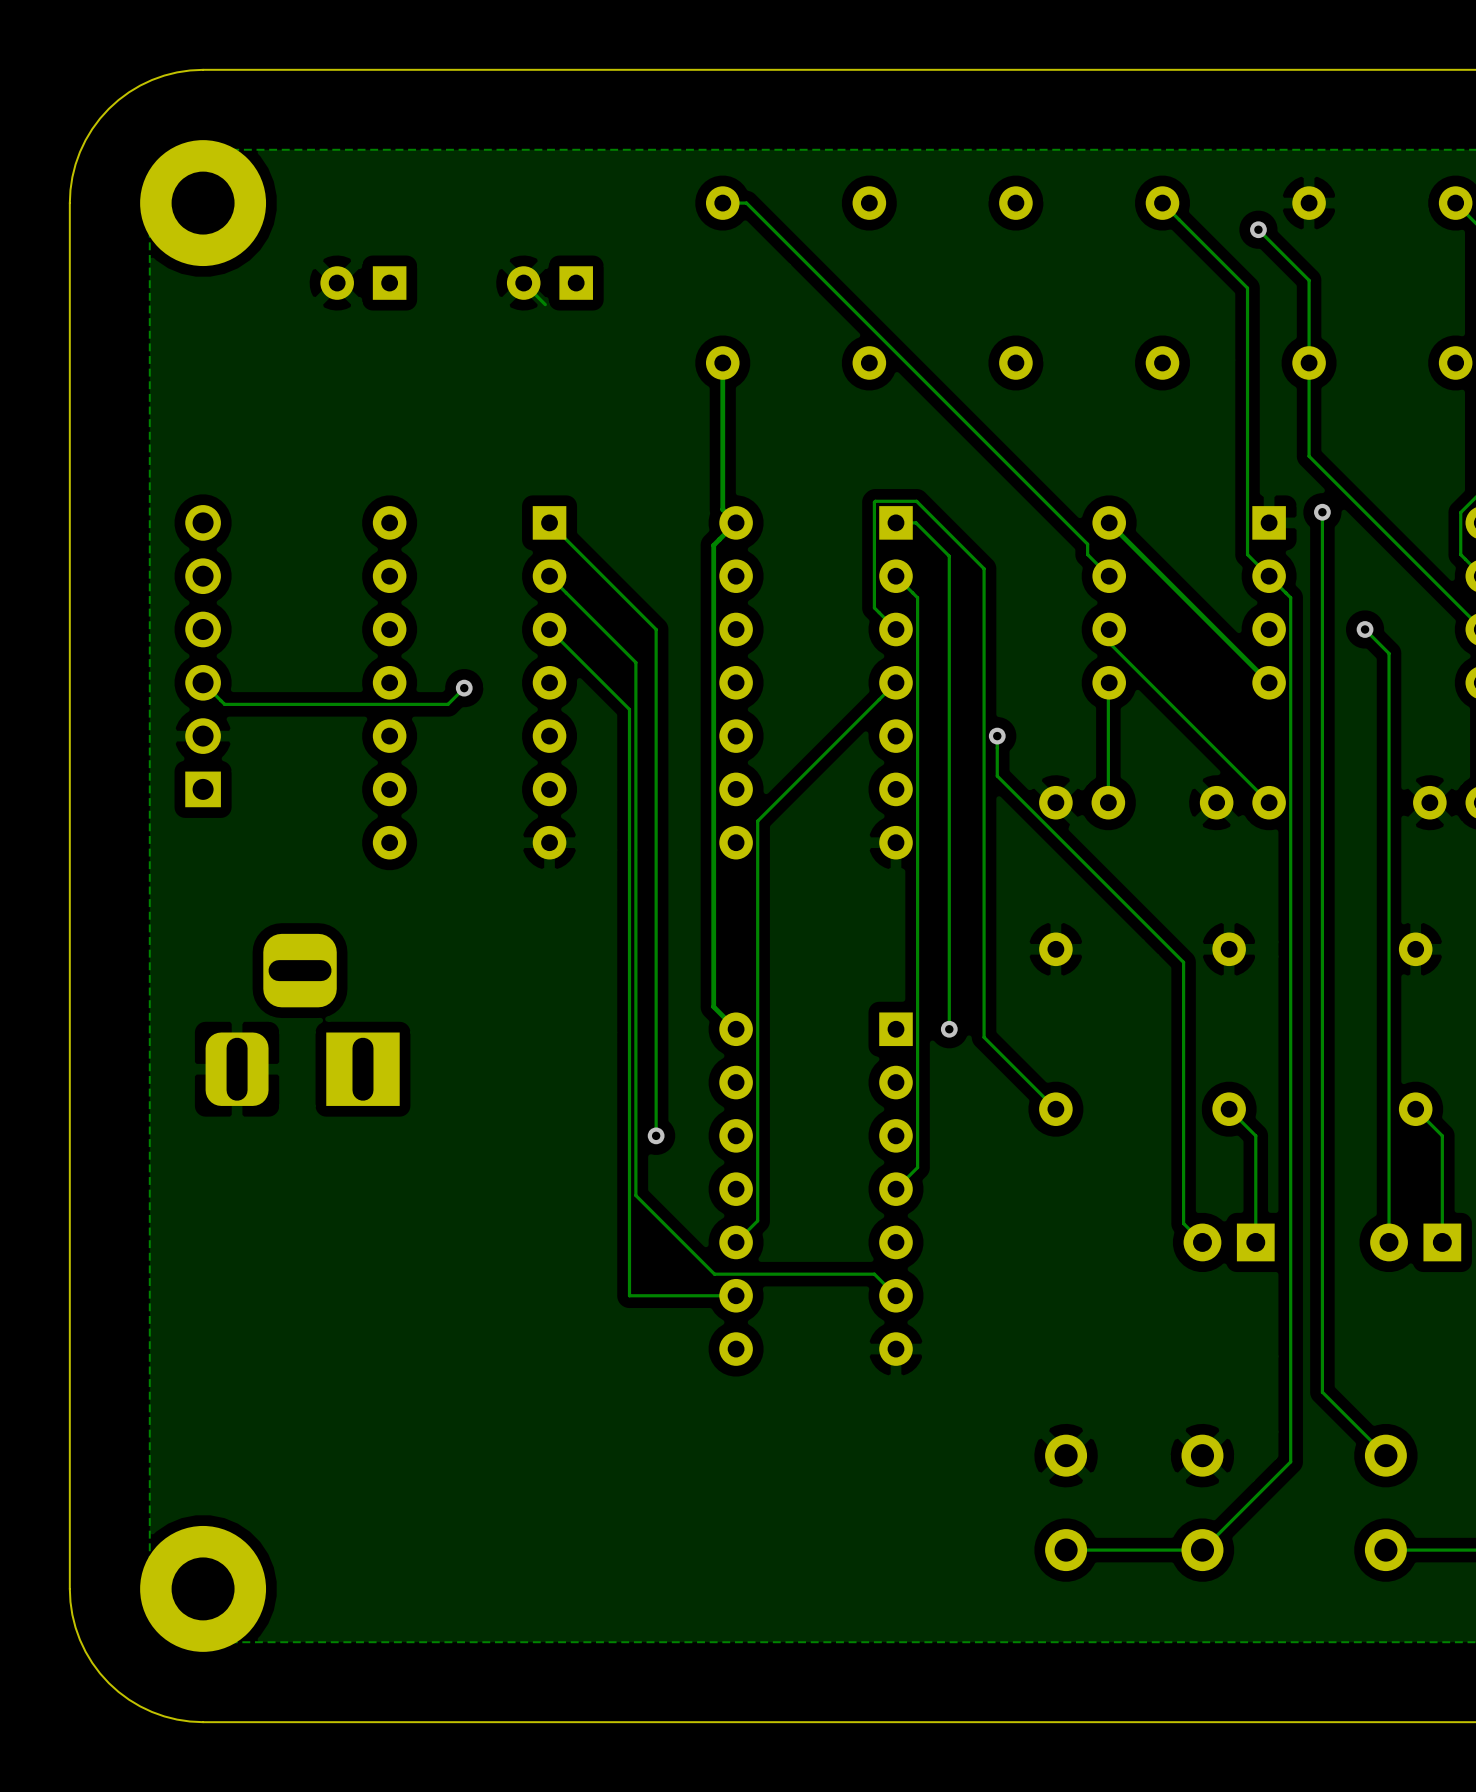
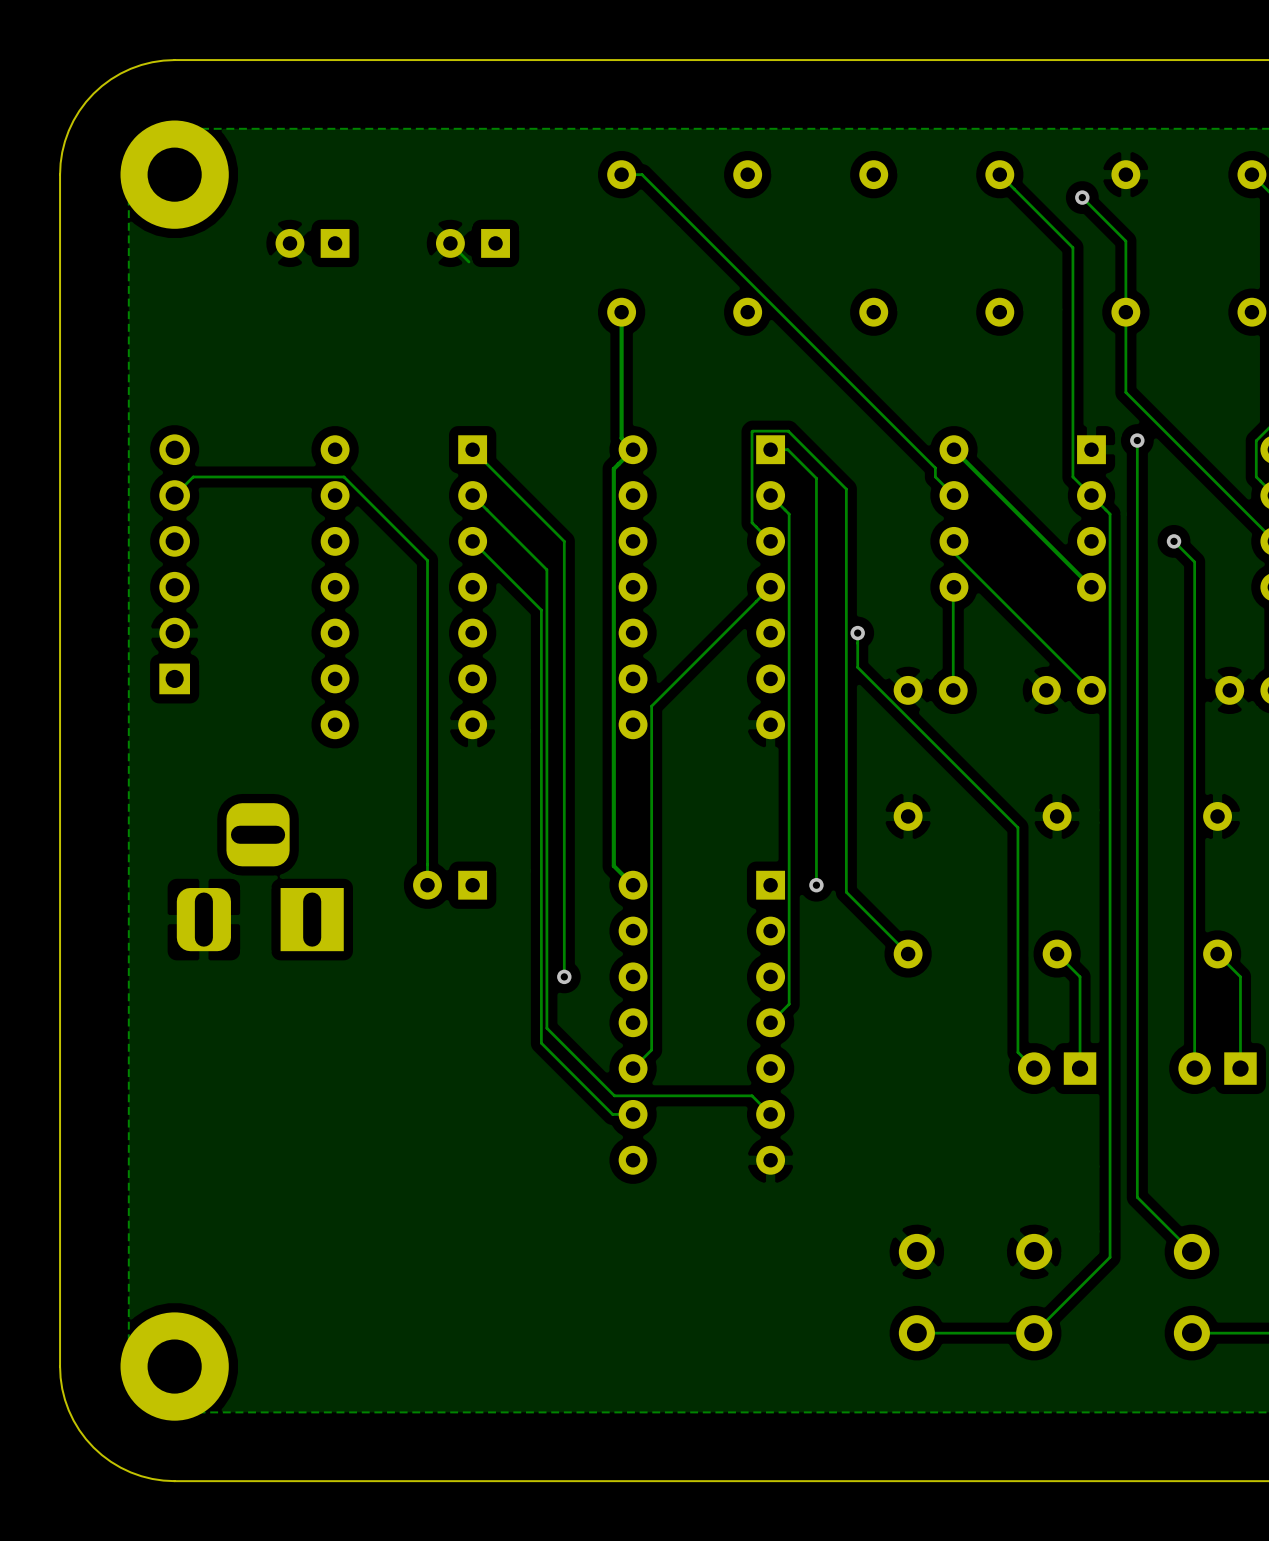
track: none -> (174, 495) (193, 476) (344, 476) (427, 560) (427, 885)
track: (203, 682) (224, 704) (448, 704) (464, 688) -> none
via: (464, 688) -> none
part: none -> (450, 885)
track: (629, 1212) (629, 1295) (712, 1295) -> (541, 1043) (612, 1114)

